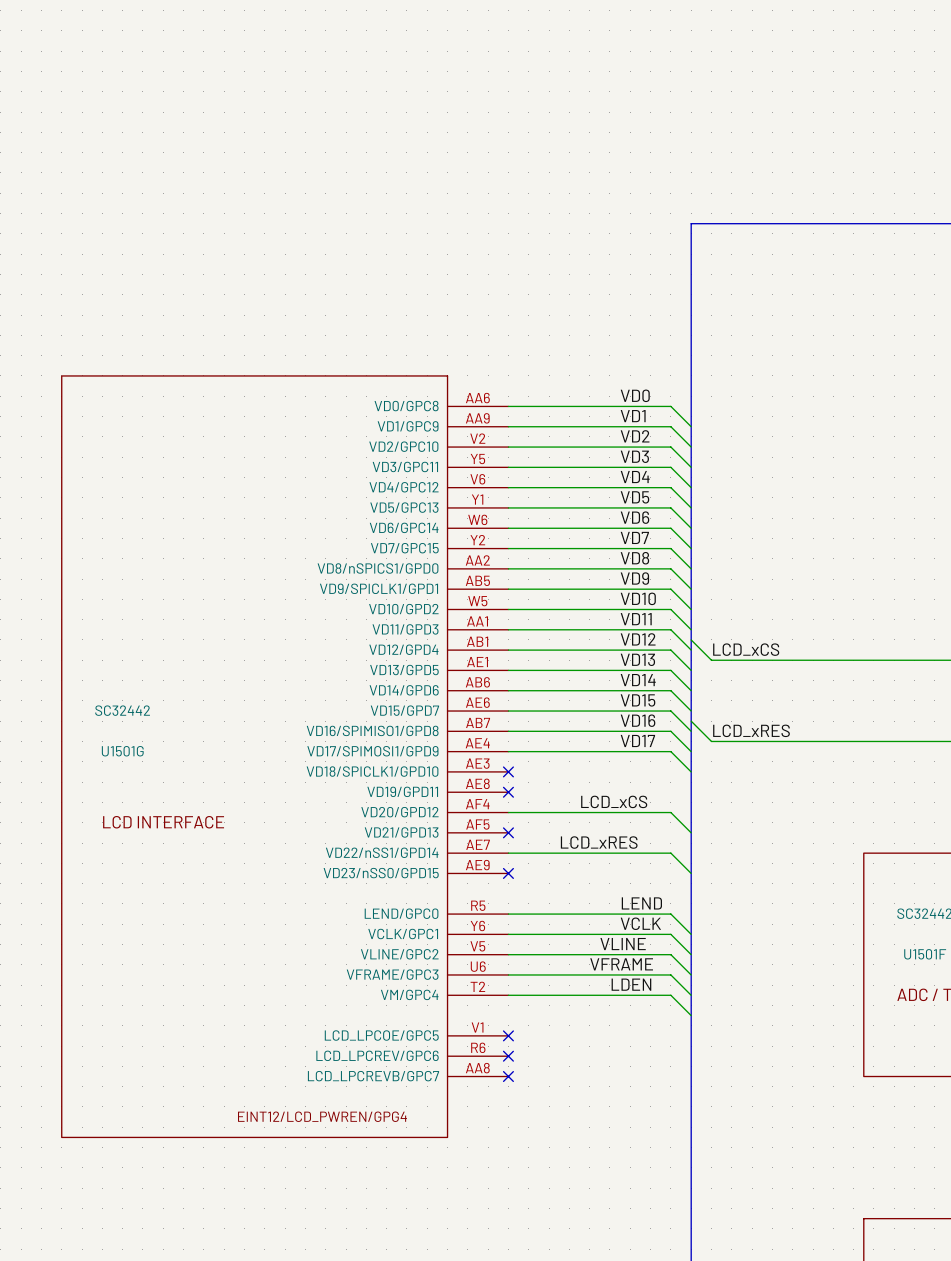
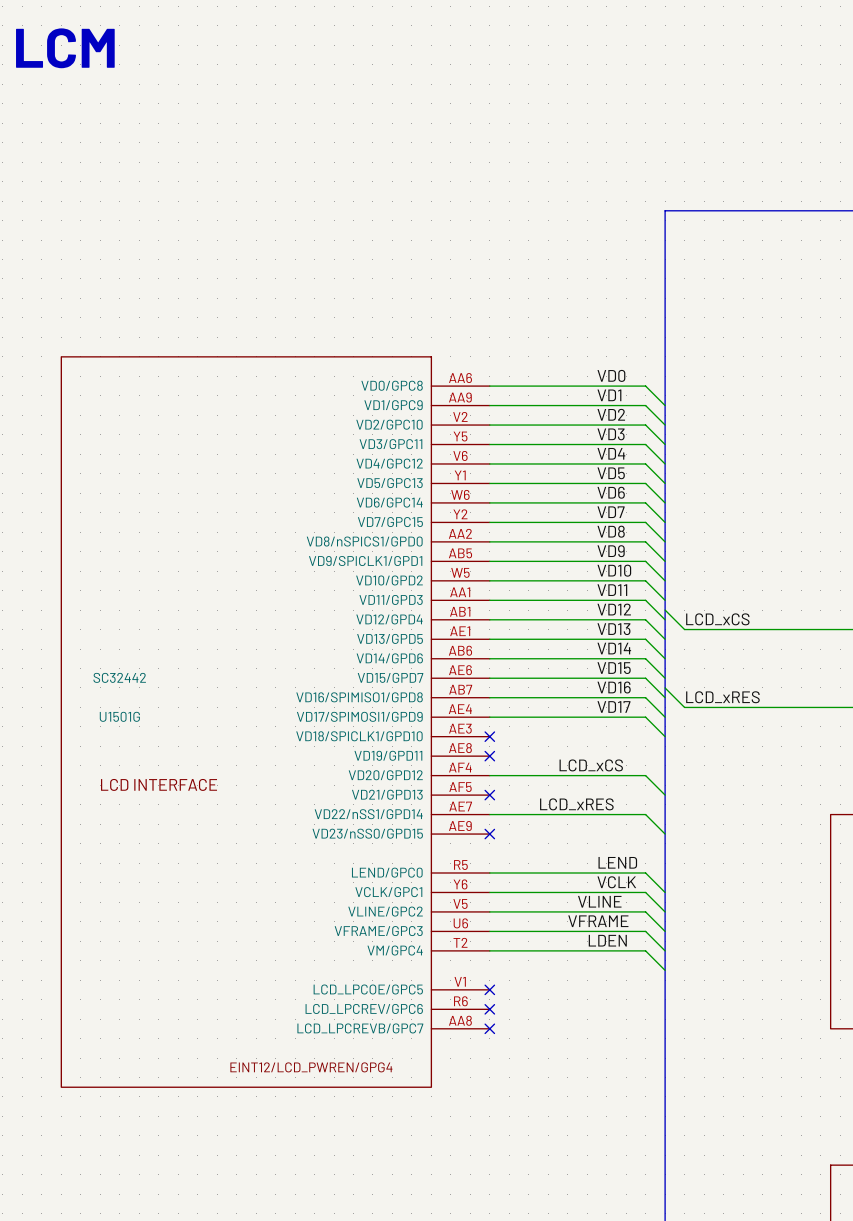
text: none -> LCM (65, 48)

